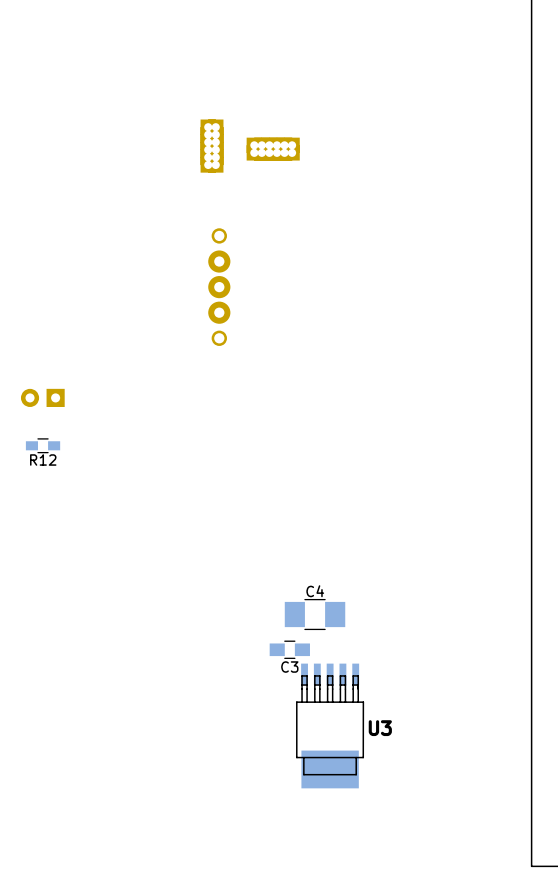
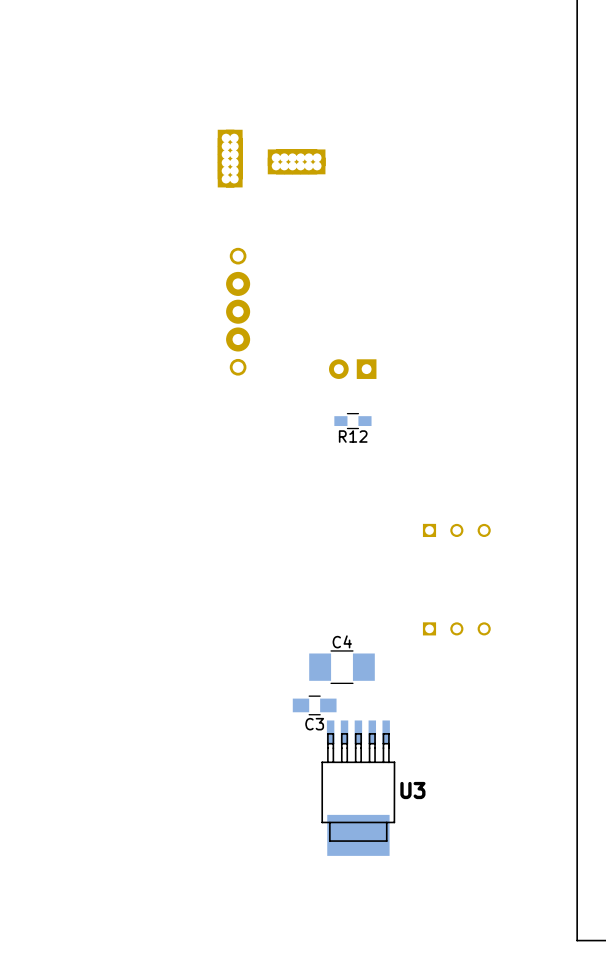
part: none -> (352, 369)
part: (42, 397) -> none
R12 position: (43, 445) -> (352, 421)
part: none -> (456, 530)
part: none -> (456, 628)

